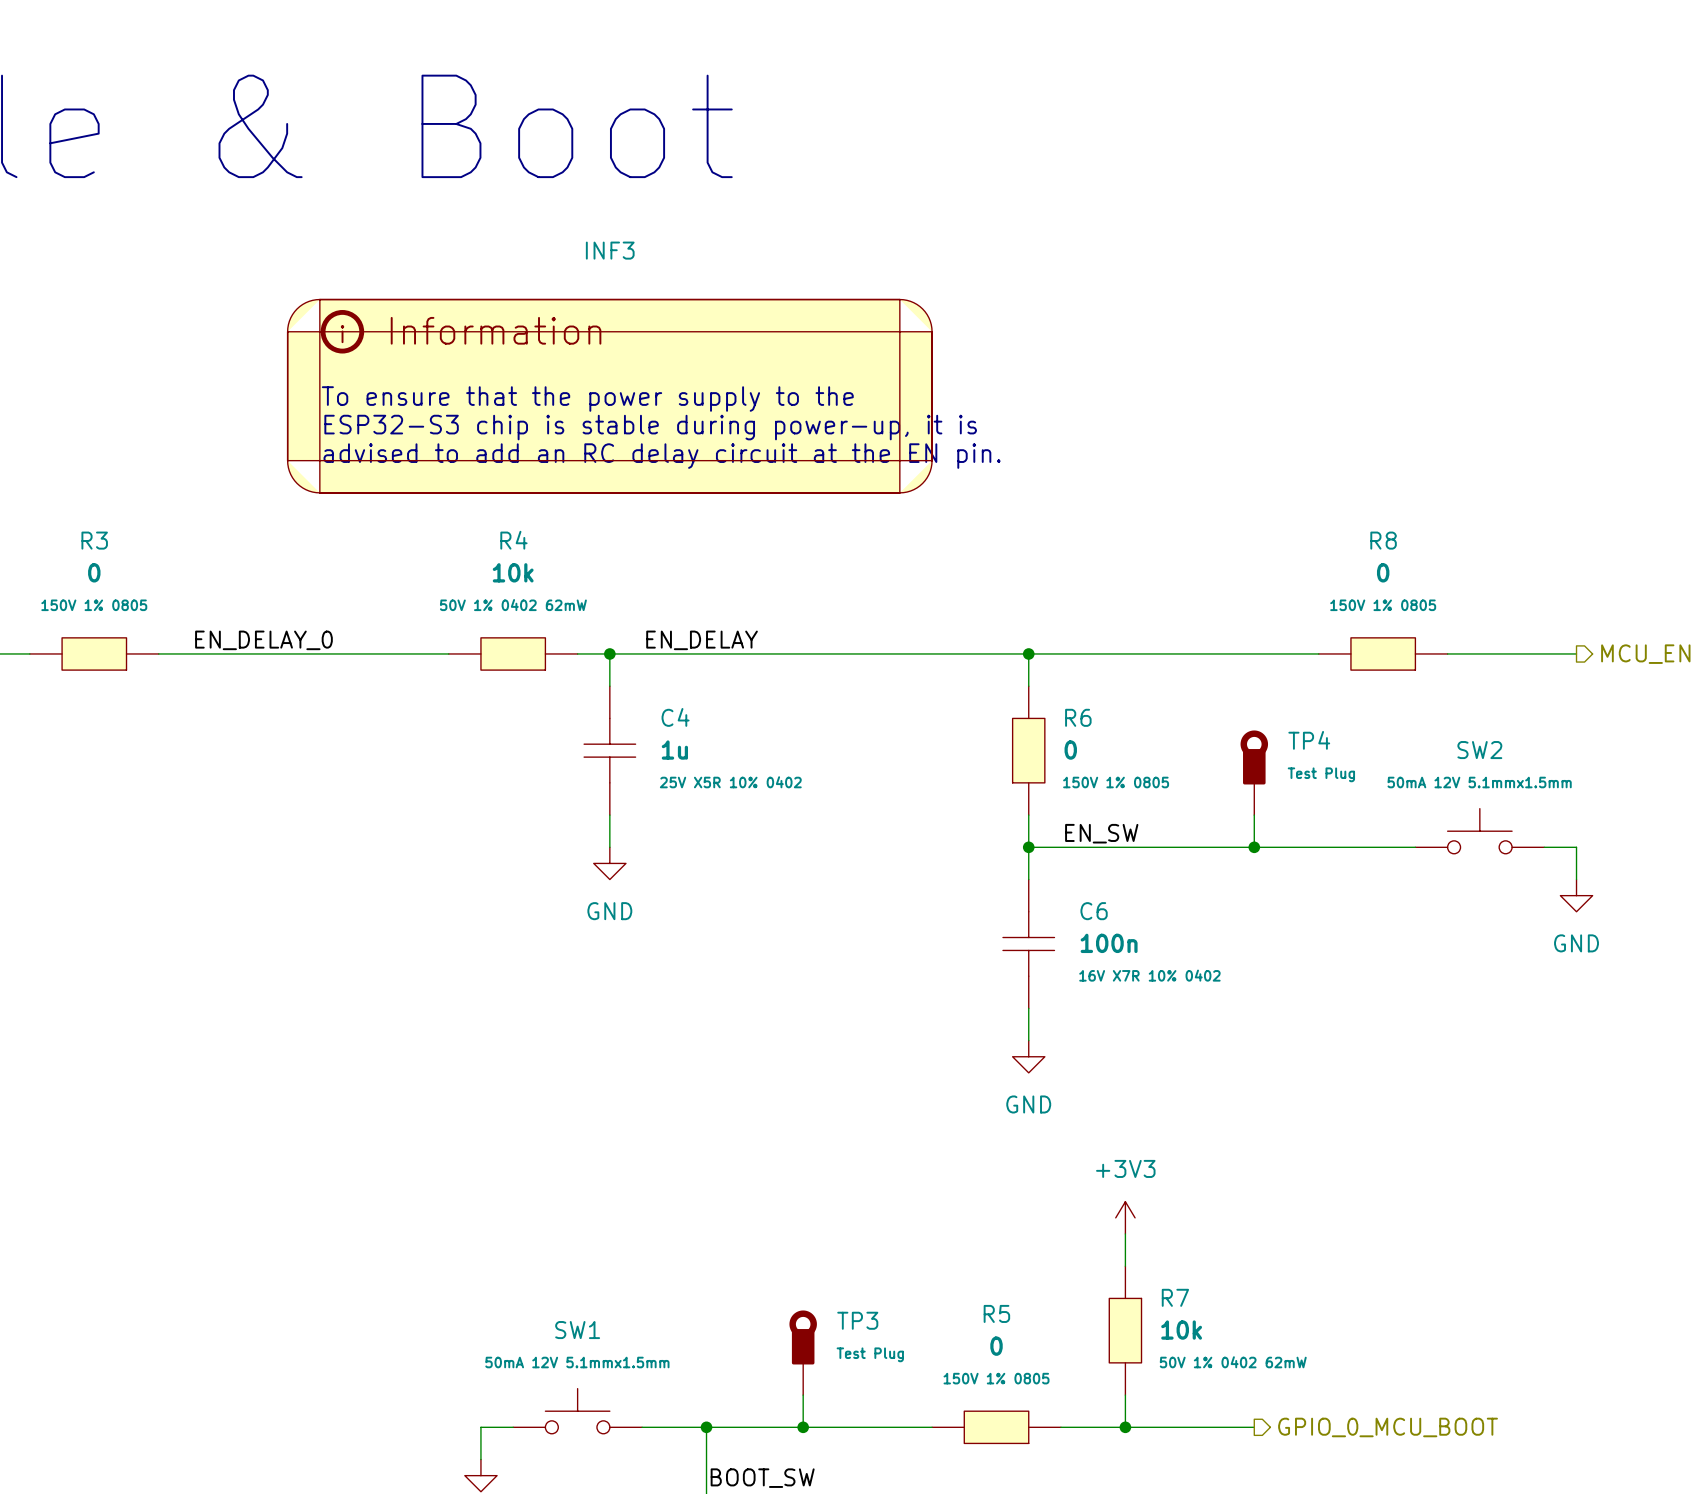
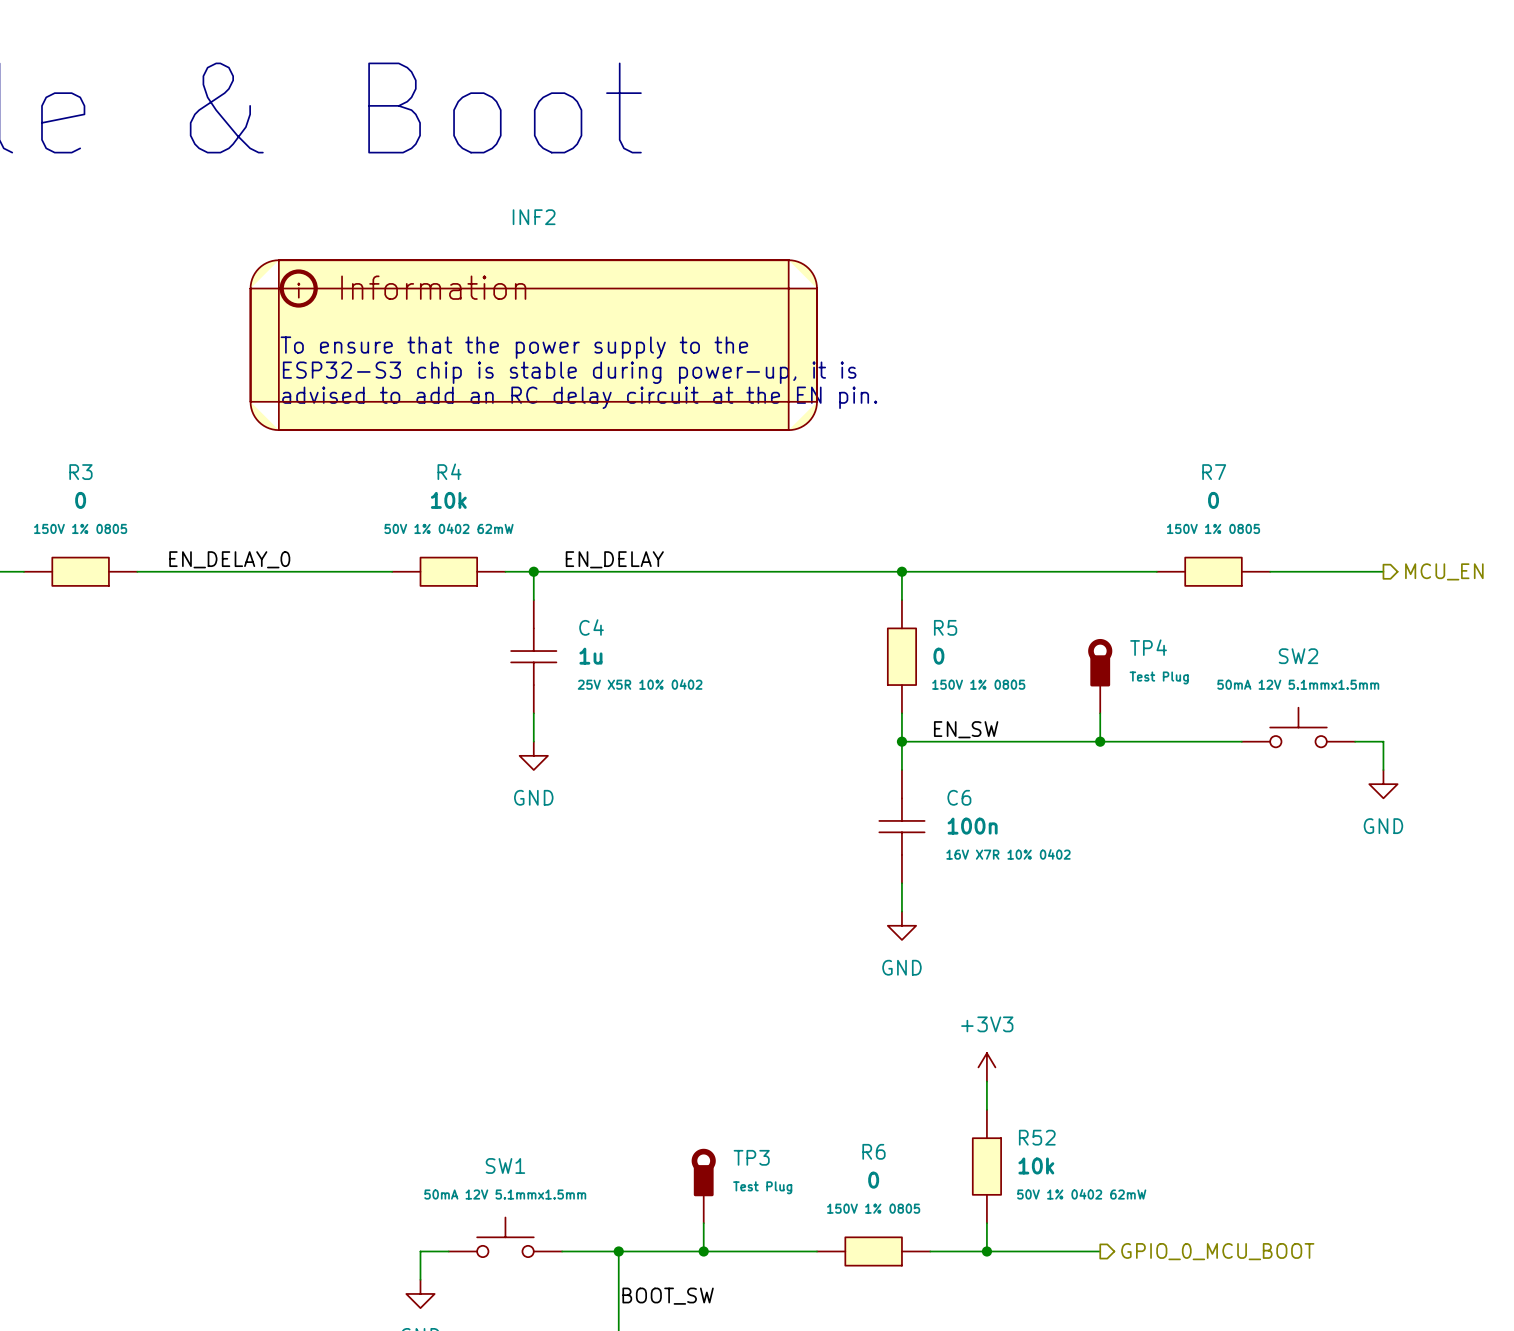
INF3 name: INF3 (610, 250) -> INF2 (534, 217)
R8 name: R8 (1383, 540) -> R7 (1214, 472)
R6 name: R6 (1078, 717) -> R5 (945, 627)
R7 name: R7 (1175, 1297) -> R52 (1037, 1137)
R5 name: R5 (996, 1313) -> R6 (873, 1151)

